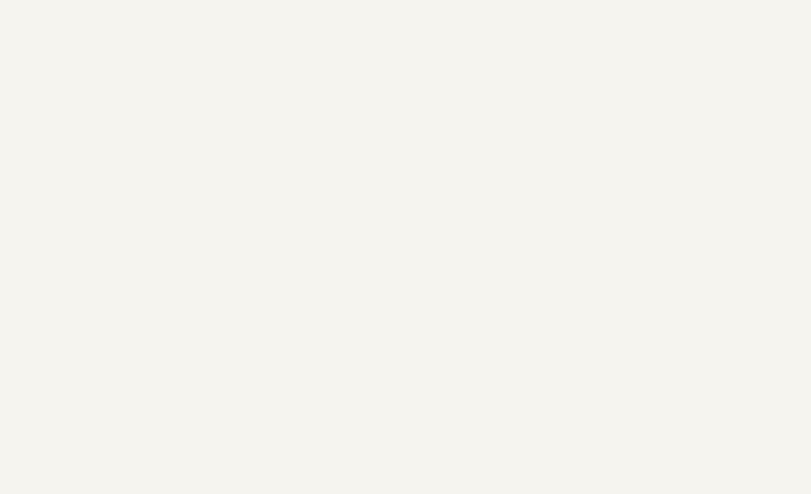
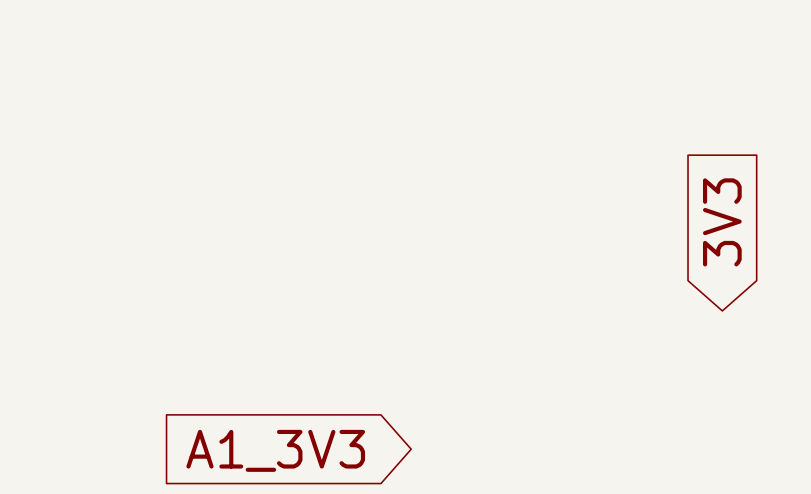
global label: none -> 3V3 (722, 222)
global label: none -> A1_3V3 (275, 450)

